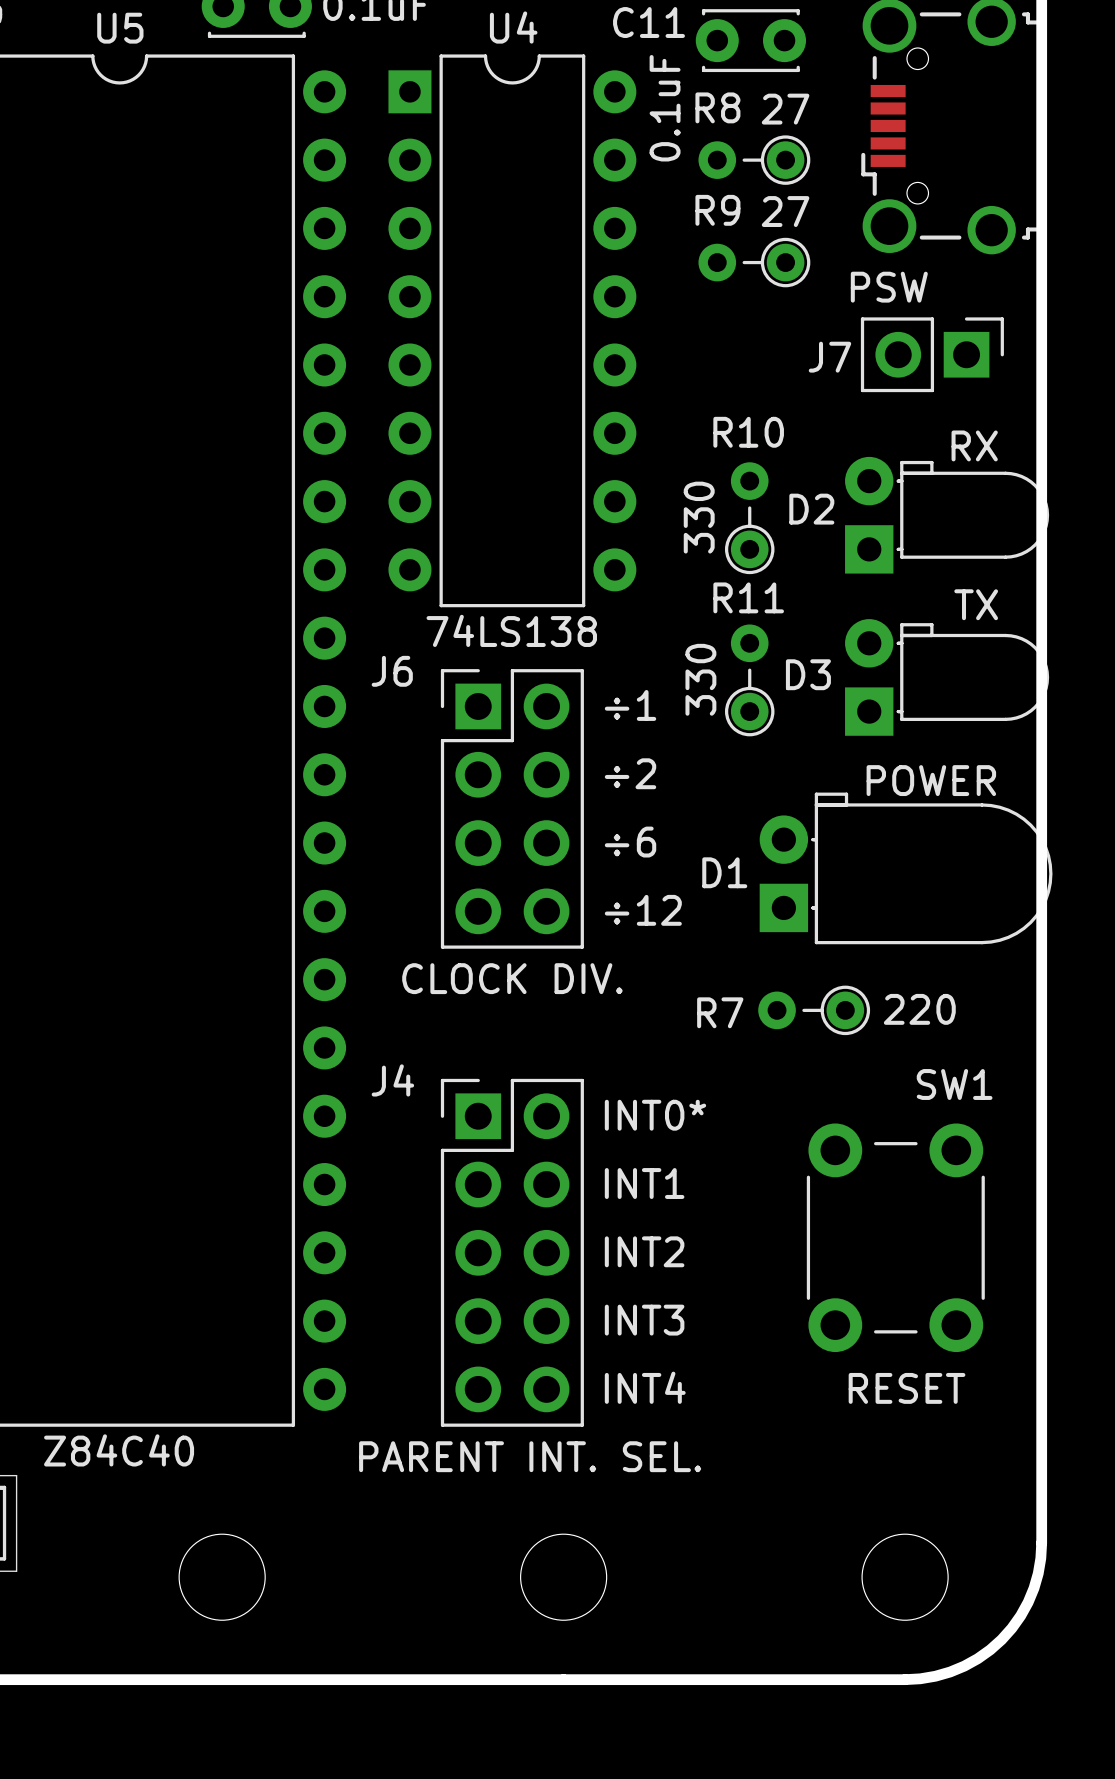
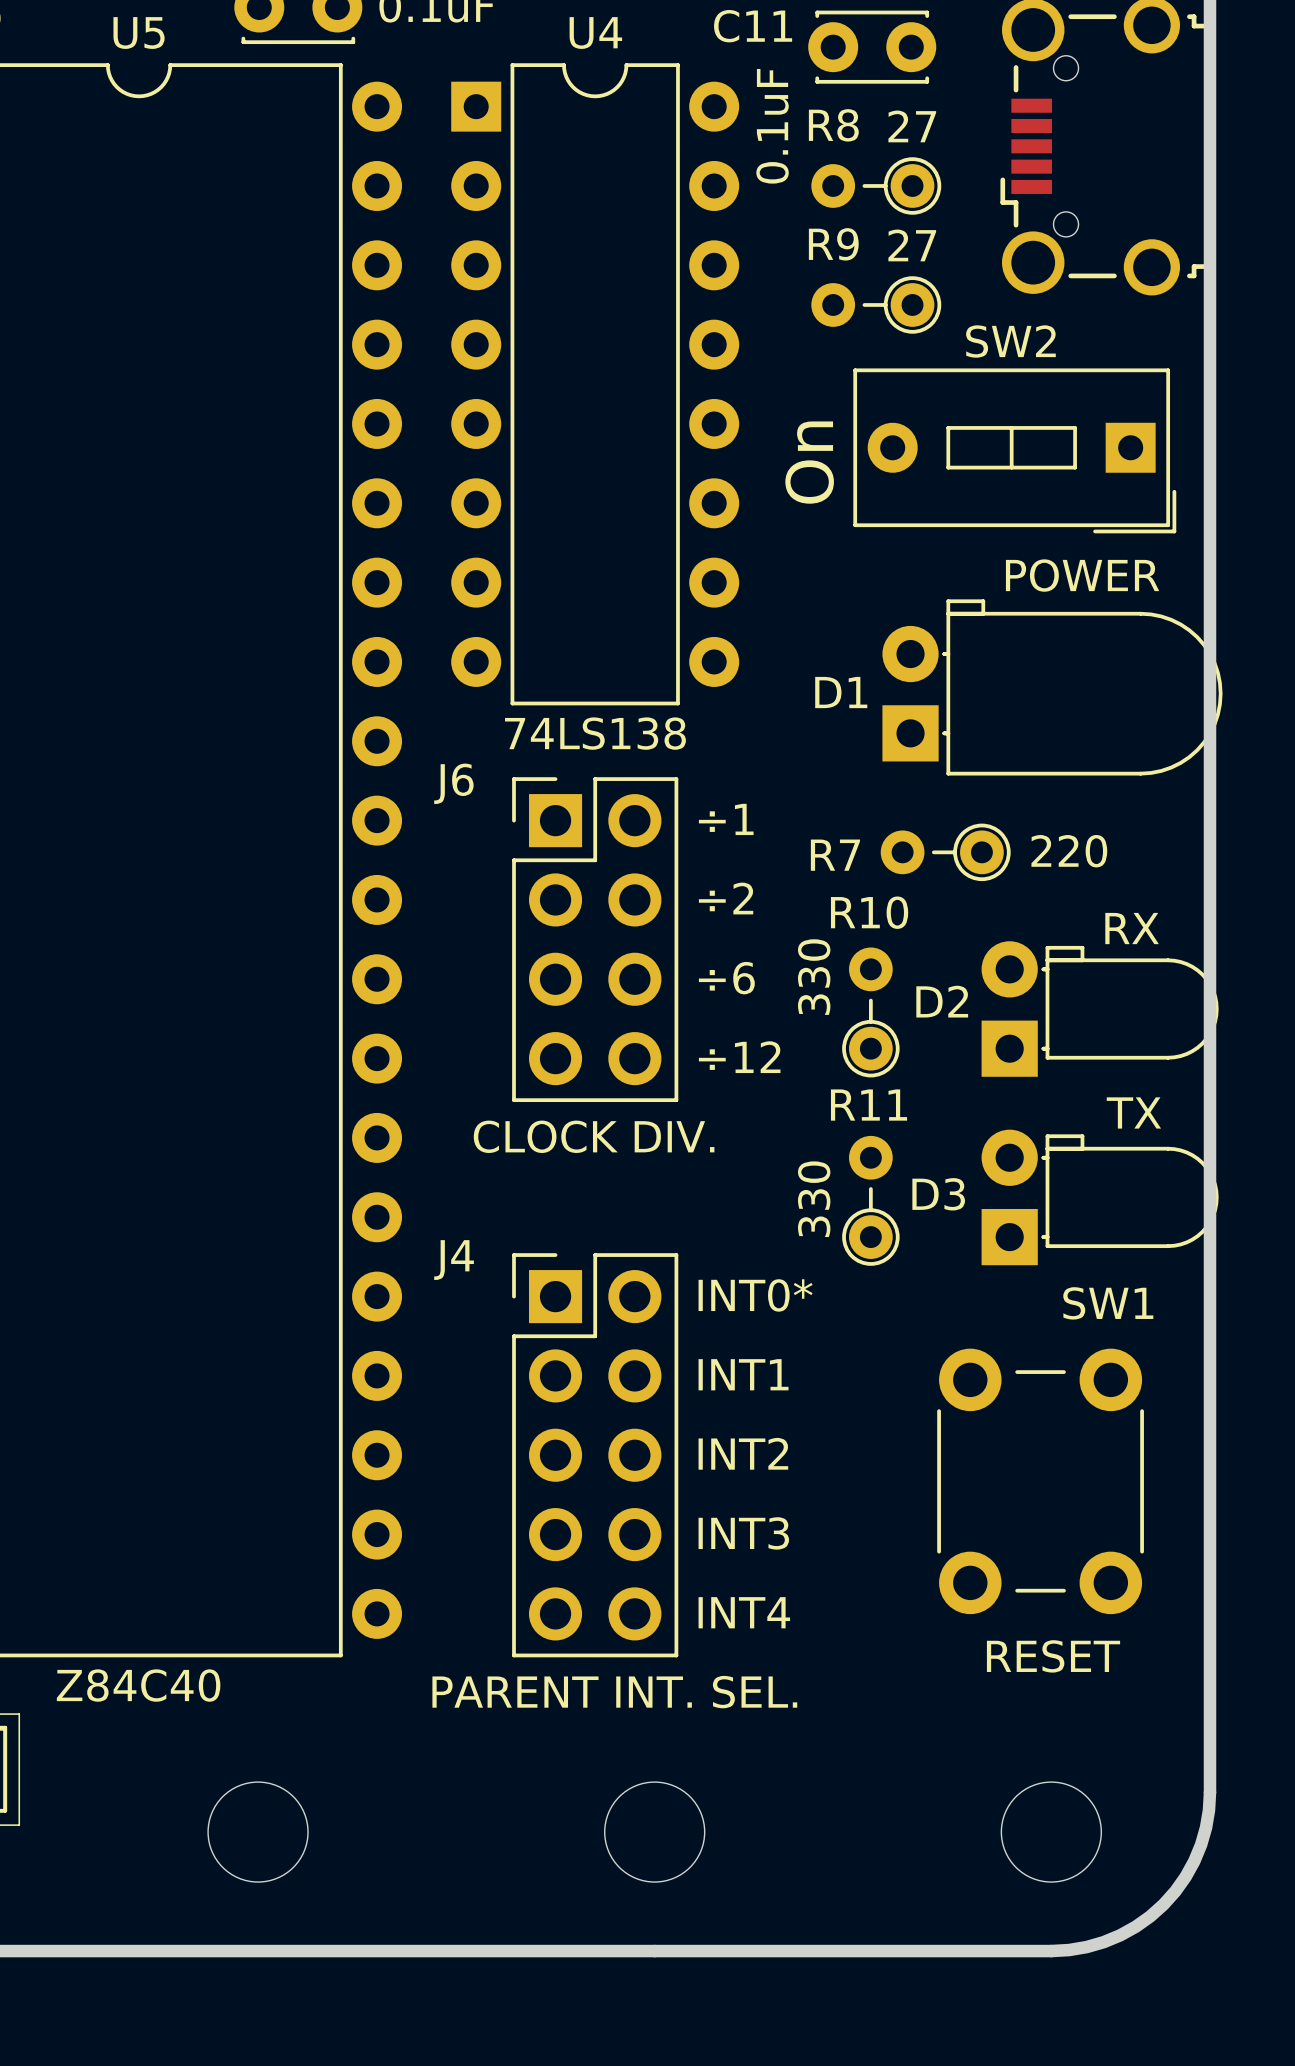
J7: PSW (932, 354) -> none
SW2: none -> (1014, 450)
text: none -> On (809, 462)
D2 position: (947, 515) -> (1100, 1009)
R10 value position: 330 (699, 517) -> 330 (814, 977)
R10 position: (749, 518) -> (870, 1012)
D3 position: (947, 677) -> (1100, 1197)
R11 position: (749, 680) -> (870, 1200)
D1 value position: POWER (931, 780) -> POWER (1082, 575)
D1 position: (906, 868) -> (1052, 687)
R7 position: (814, 1010) -> (945, 852)
SW1 position: (895, 1237) -> (1040, 1481)

